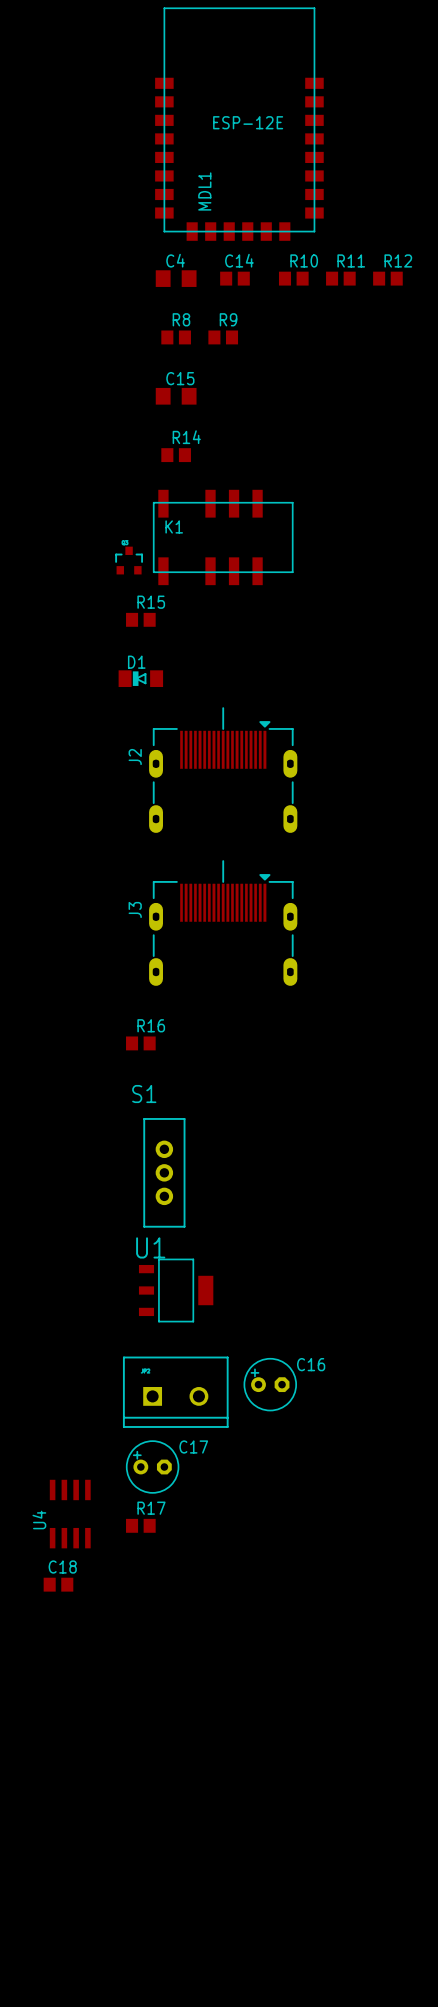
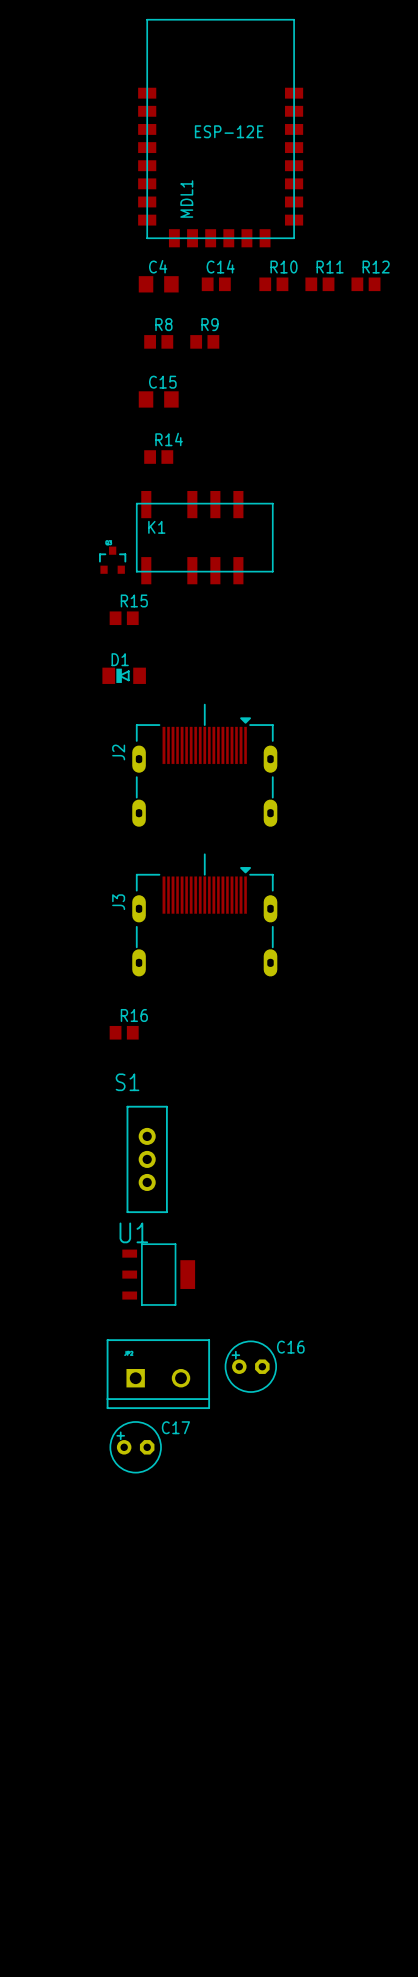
U4: (70, 1514) -> none
R17: (140, 1525) -> none
C18: (58, 1584) -> none

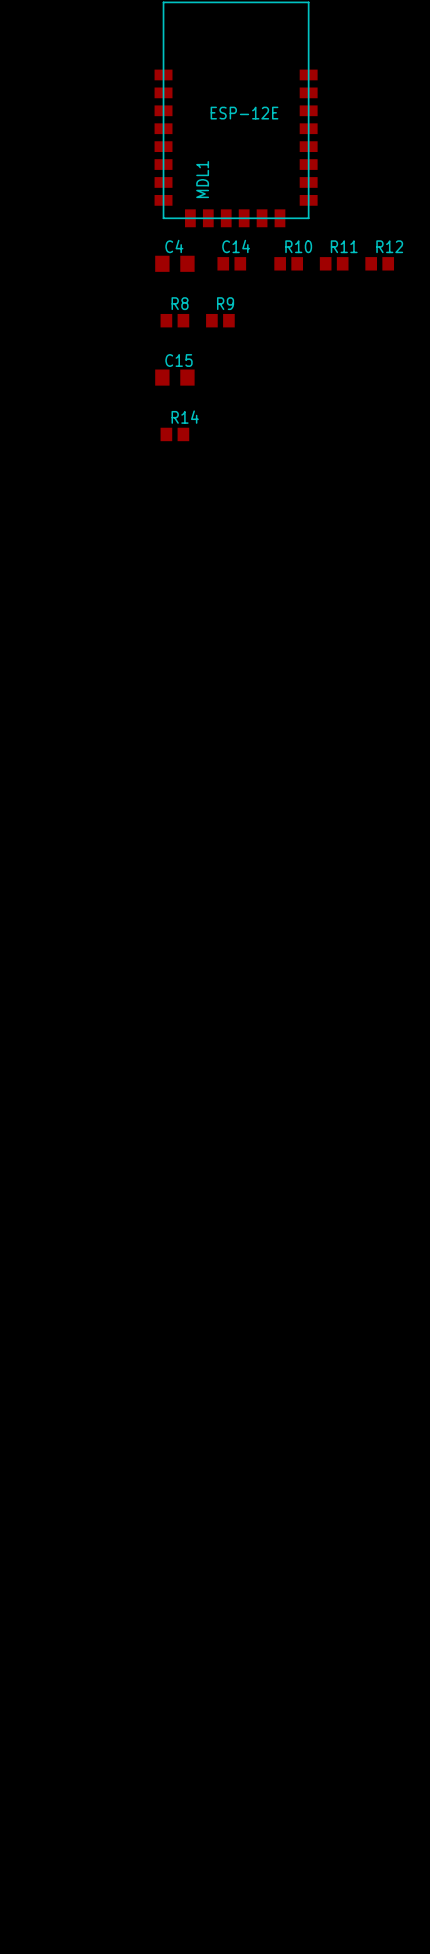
K1: (204, 537) -> none
part: (112, 560) -> none
R15: (124, 618) -> none
D1: (124, 675) -> none
J2: (204, 765) -> none
J3: (204, 914) -> none
R16: (124, 1032) -> none
S1: (147, 1159) -> none
U1: (158, 1274) -> none
C16: (250, 1366) -> none
part: (158, 1374) -> none
C17: (135, 1447) -> none

